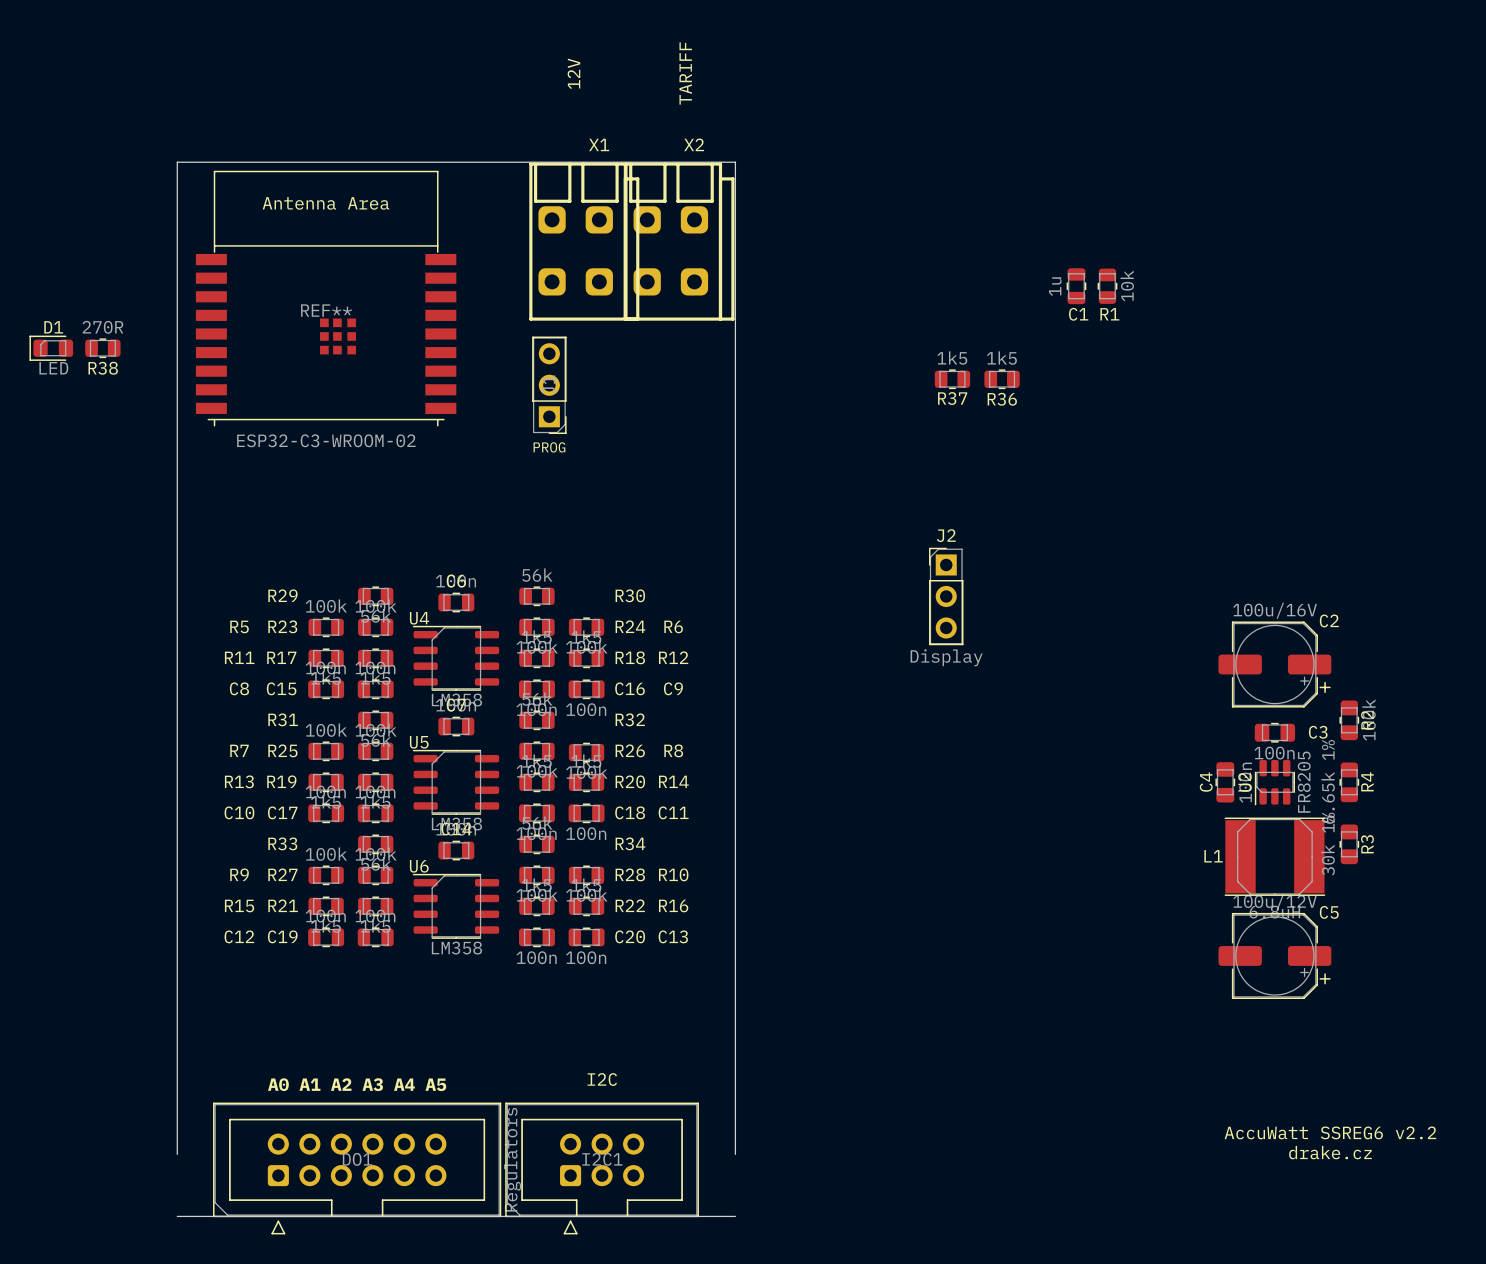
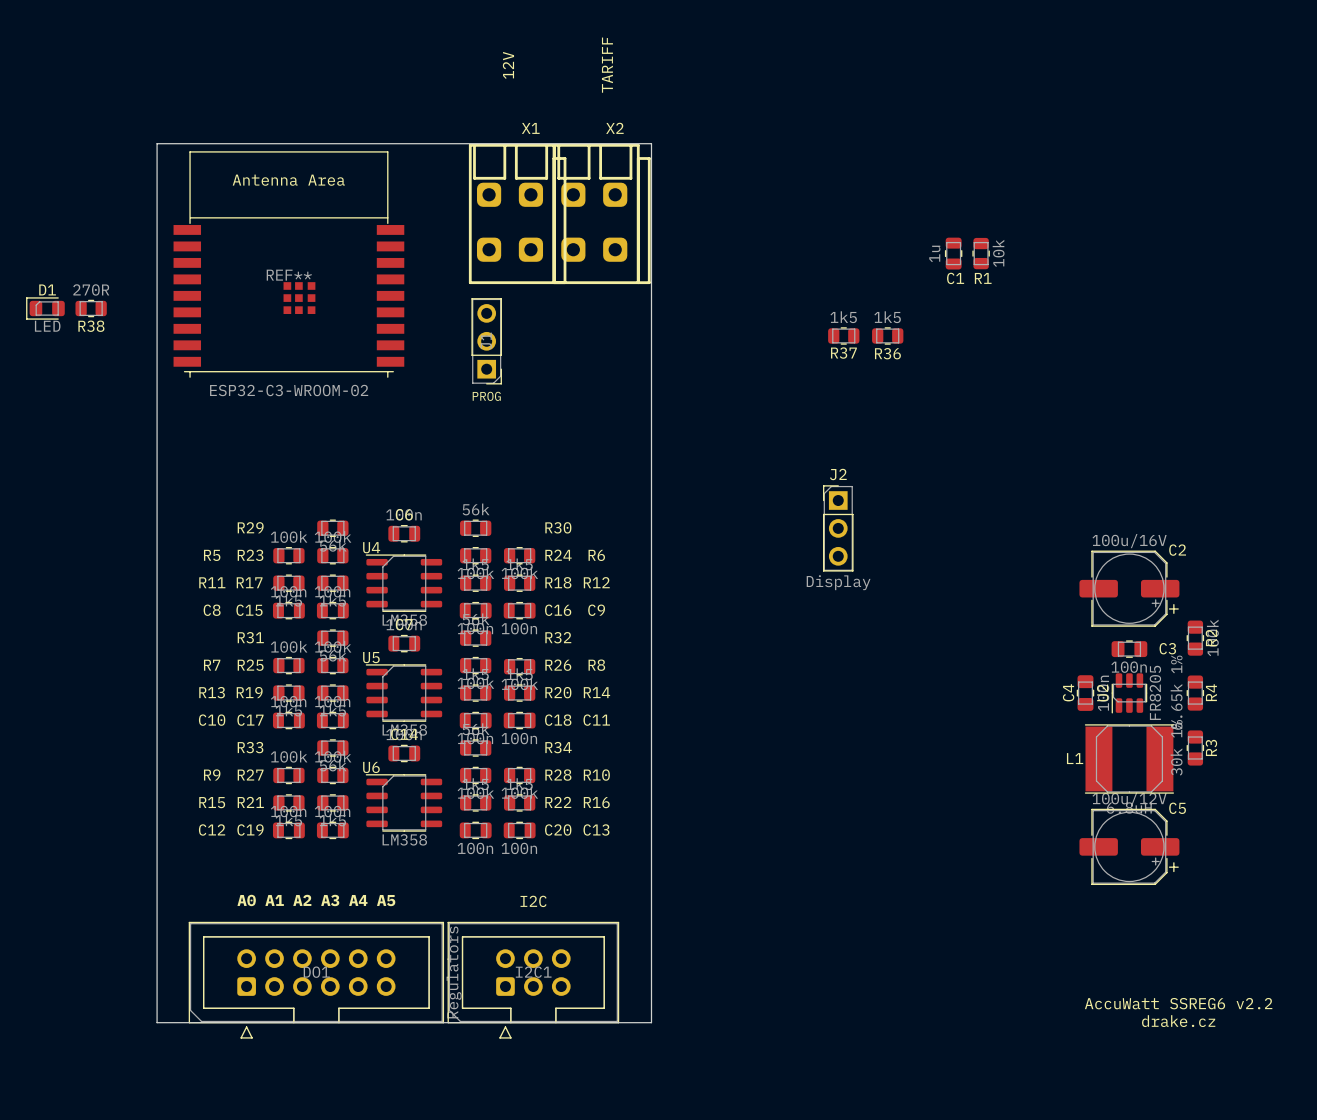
text position: A0 (278, 1084) -> A0 (246, 900)
text position: A1 (309, 1084) -> A1 (274, 900)
text position: A2 (341, 1084) -> A2 (302, 900)
text position: A3 (372, 1084) -> A3 (330, 900)
text position: A4 (404, 1084) -> A4 (358, 900)
text position: A5 (435, 1084) -> A5 (386, 900)
DO1 position: (357, 1168) -> (316, 980)
I2C1 position: (602, 1168) -> (533, 980)
board edge: (177, 1216) (735, 1216) -> (157, 1022) (651, 1022)

